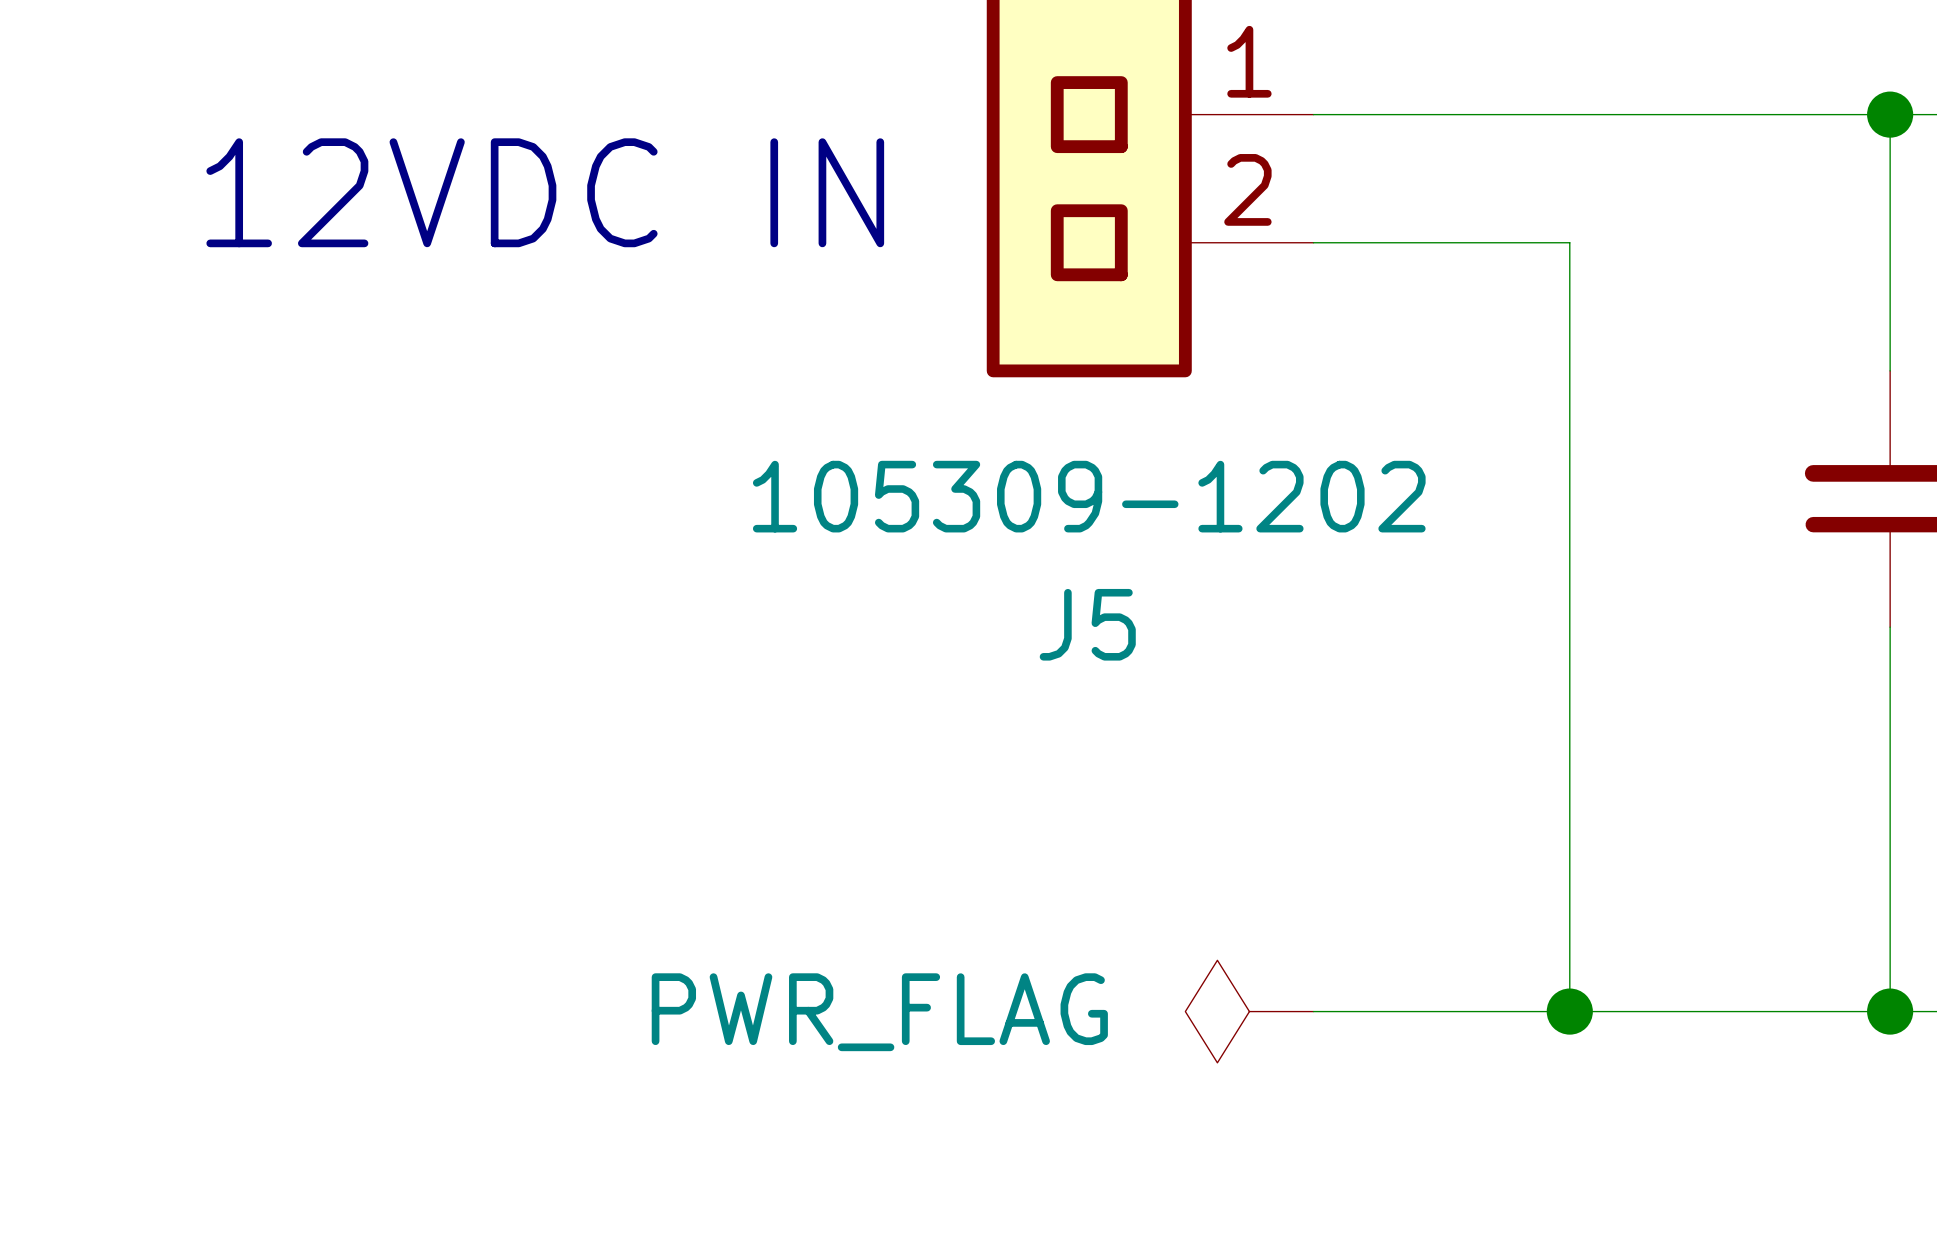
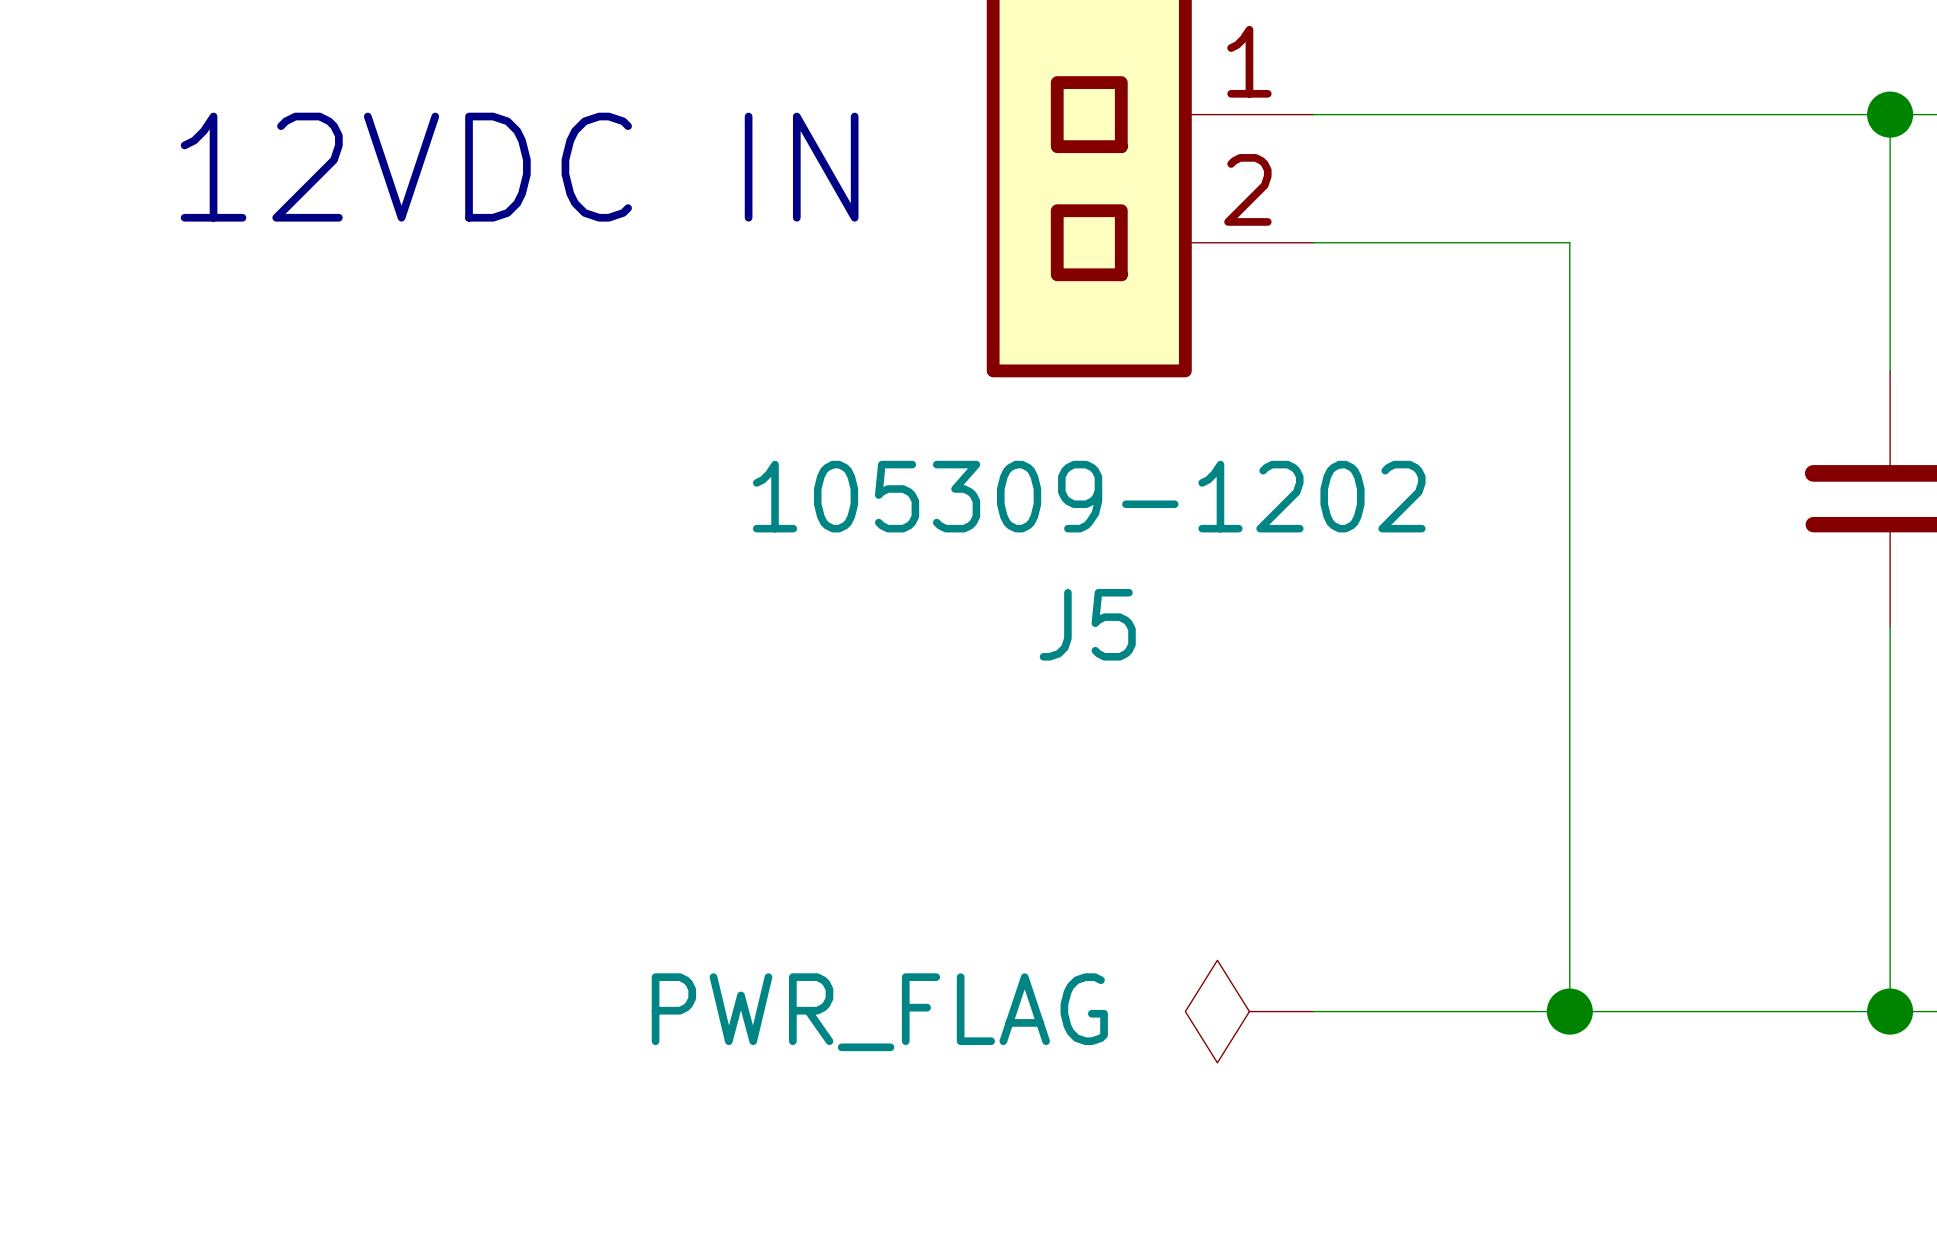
text position: 12VDC IN (545, 192) -> 12VDC IN (519, 167)

